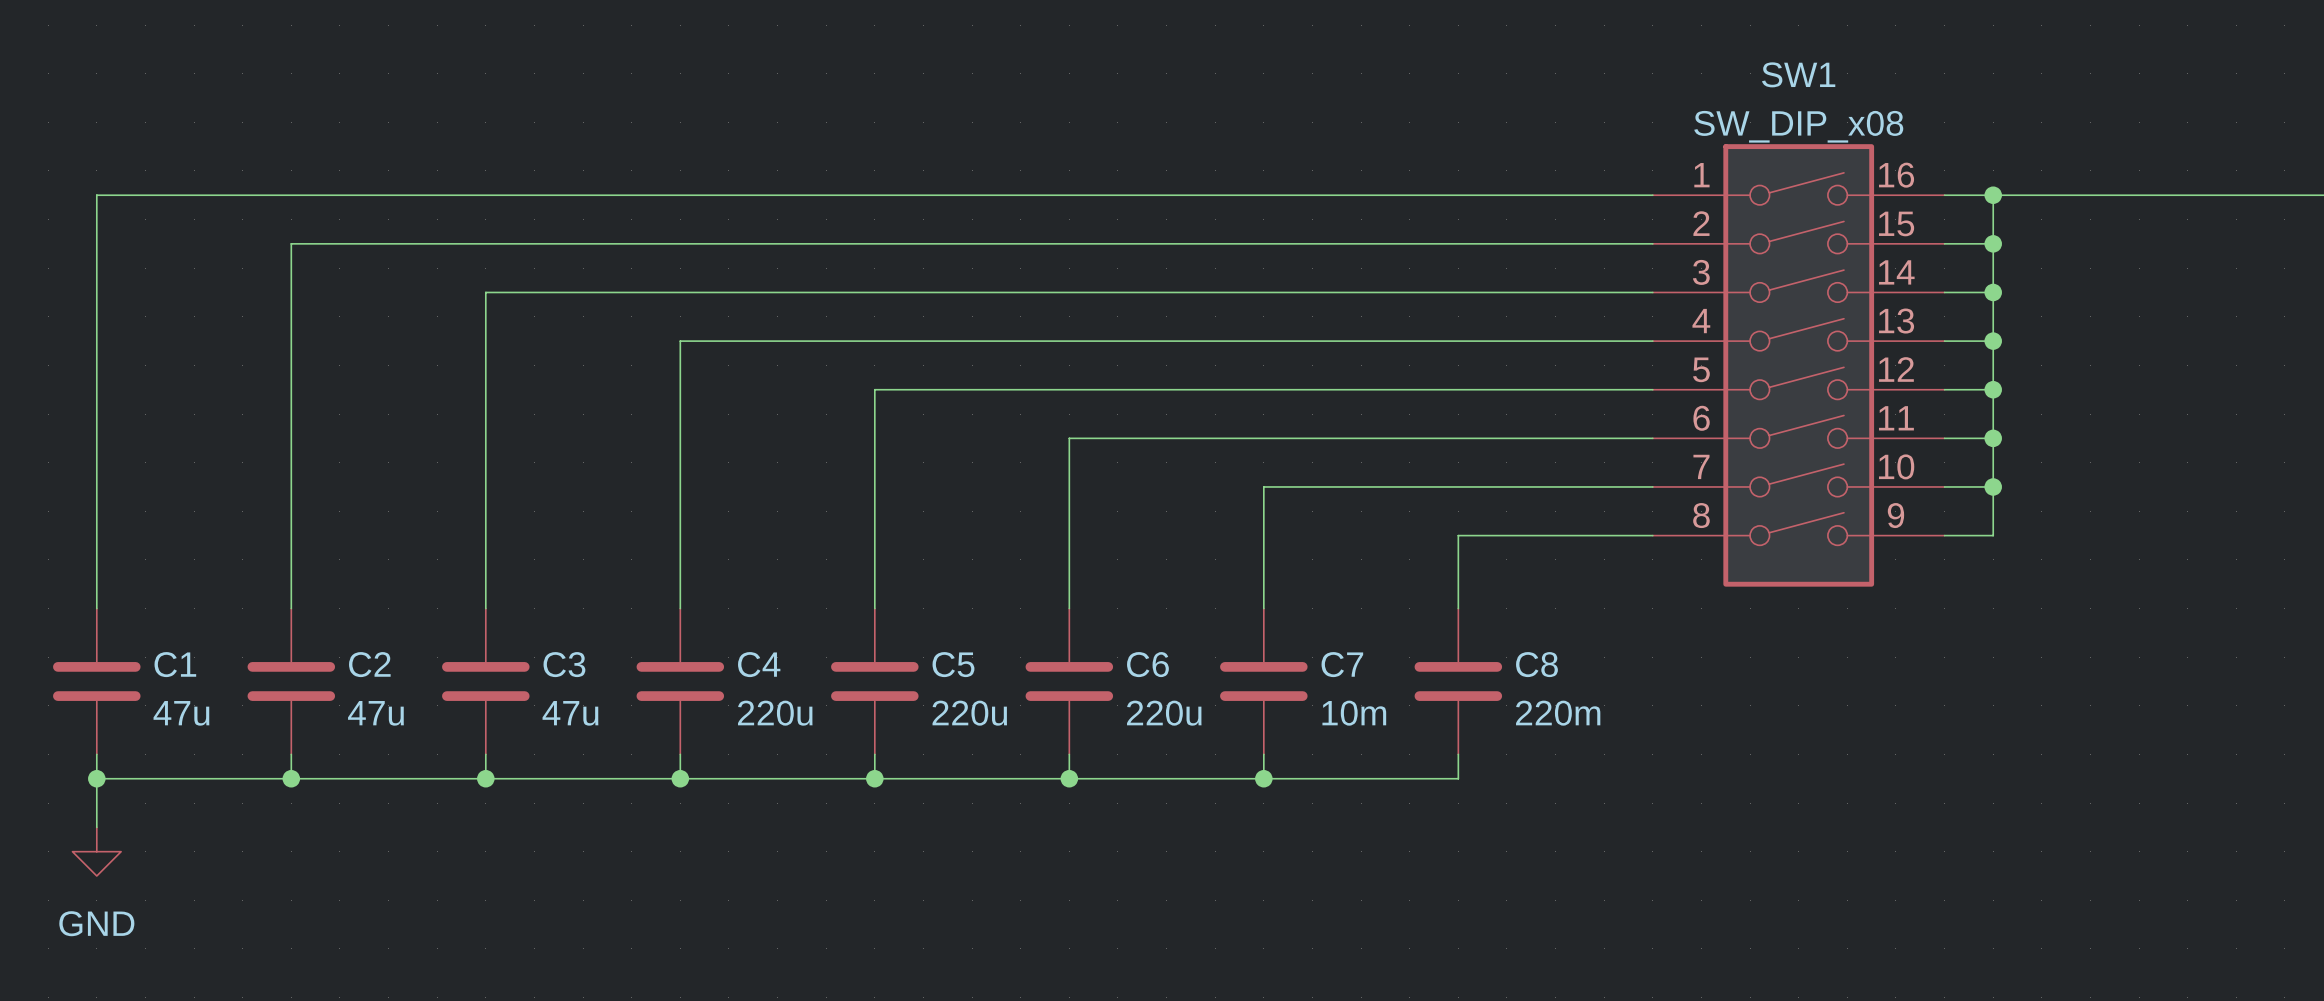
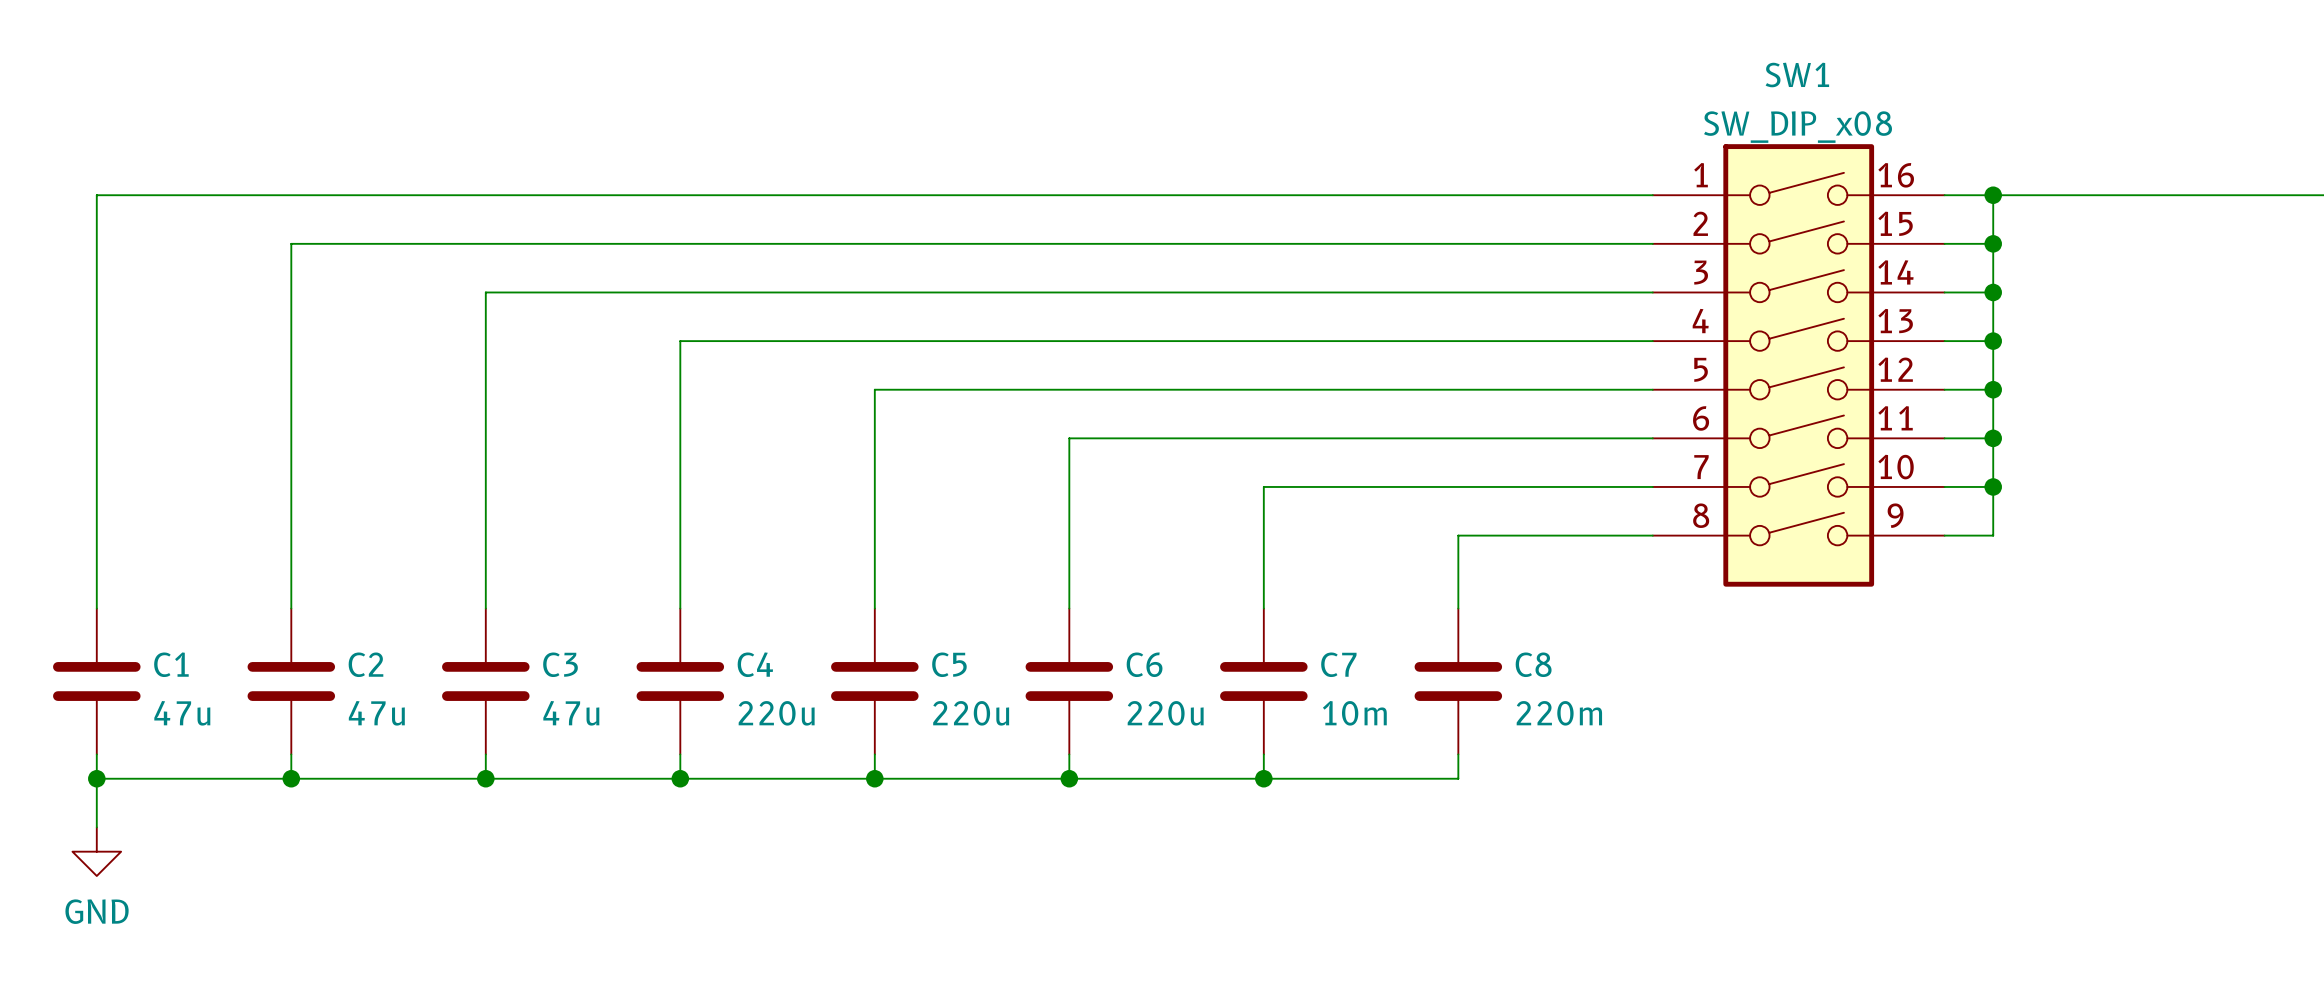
power symbol text position: GND (96, 923) -> GND (97, 911)

